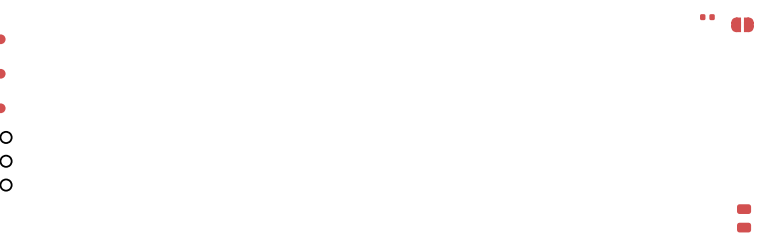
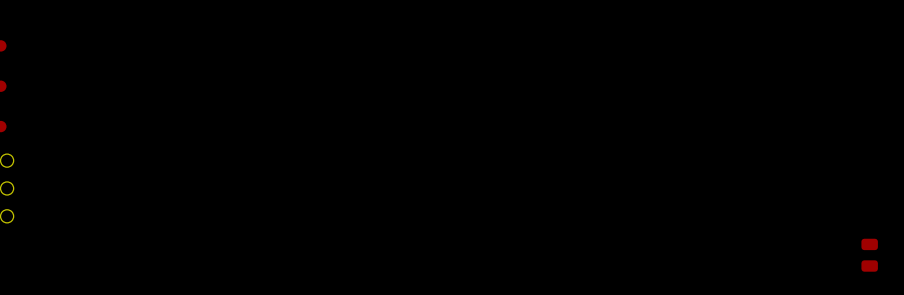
part: (707, 17) -> none
part: (742, 24) -> none

